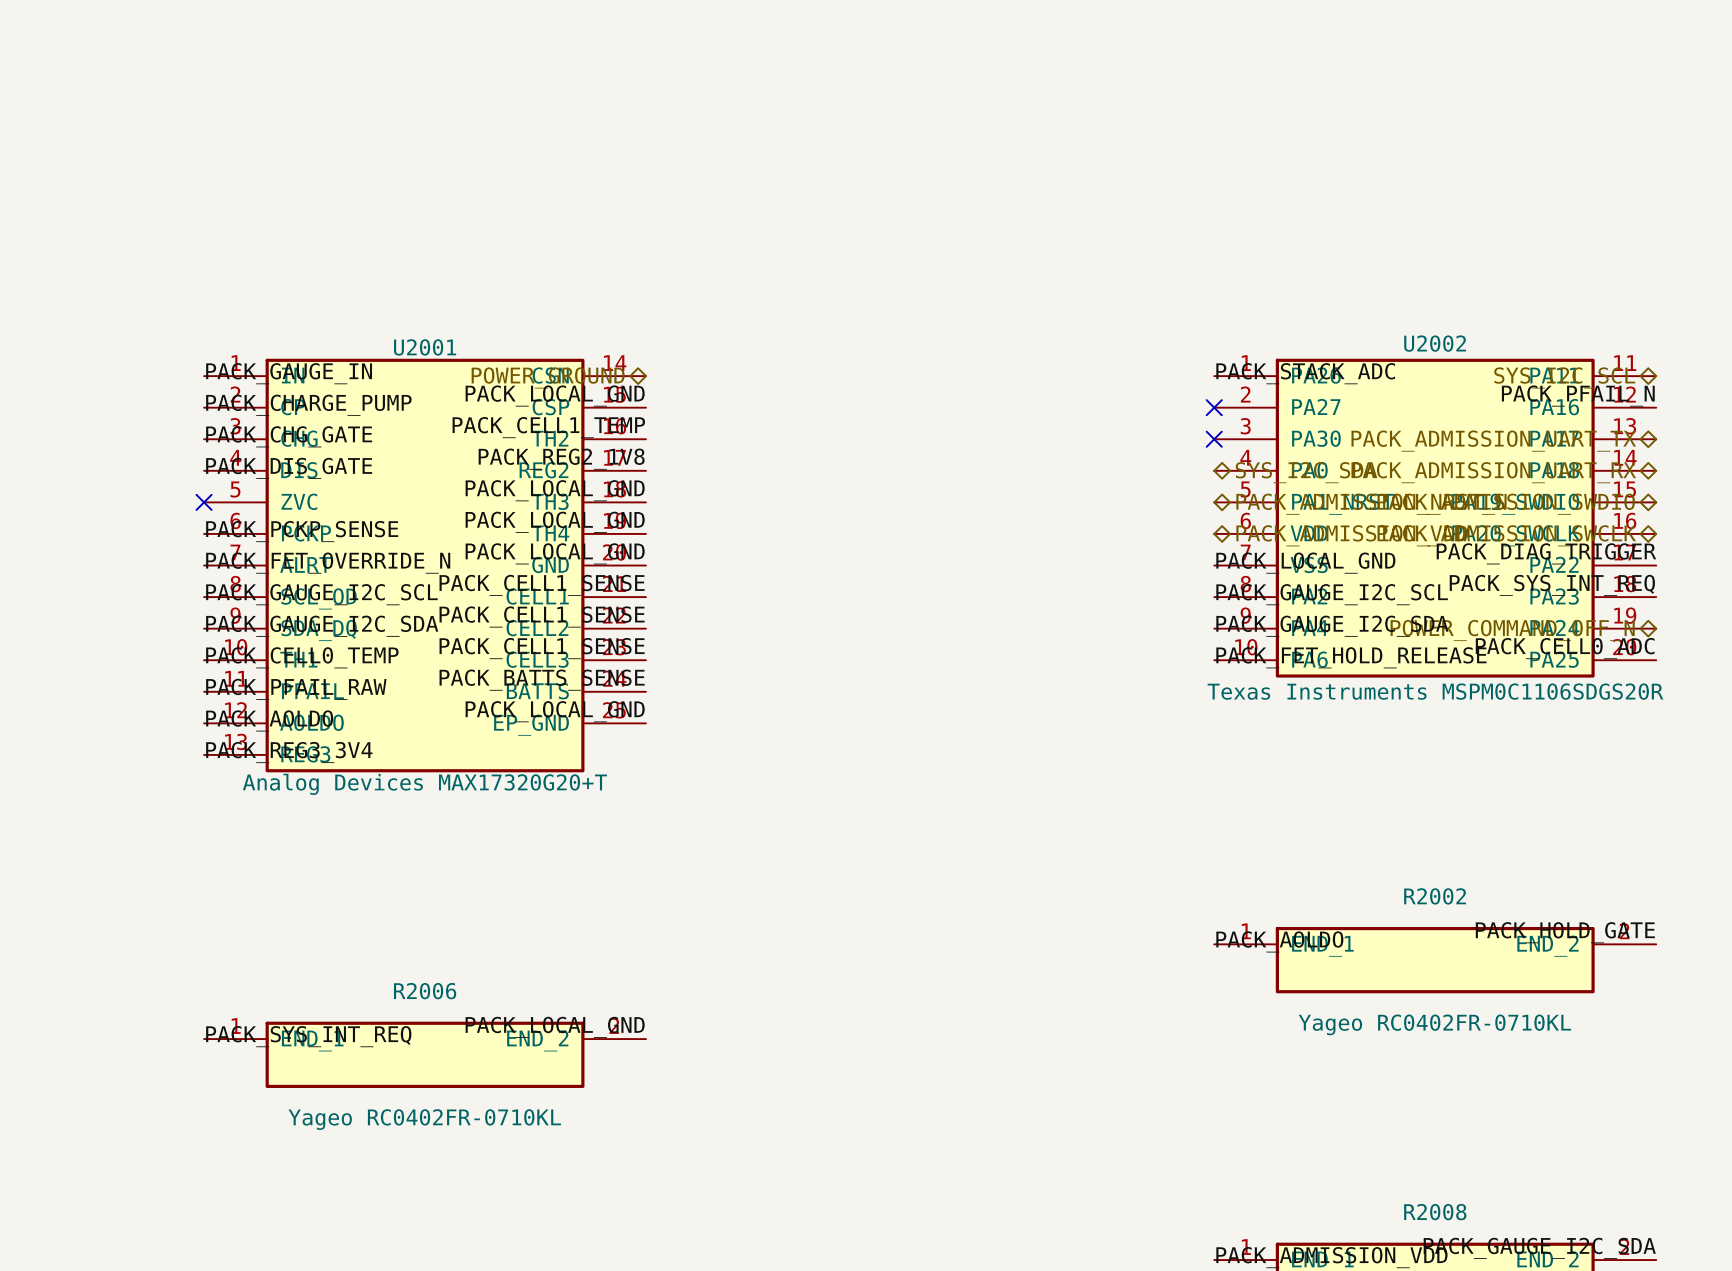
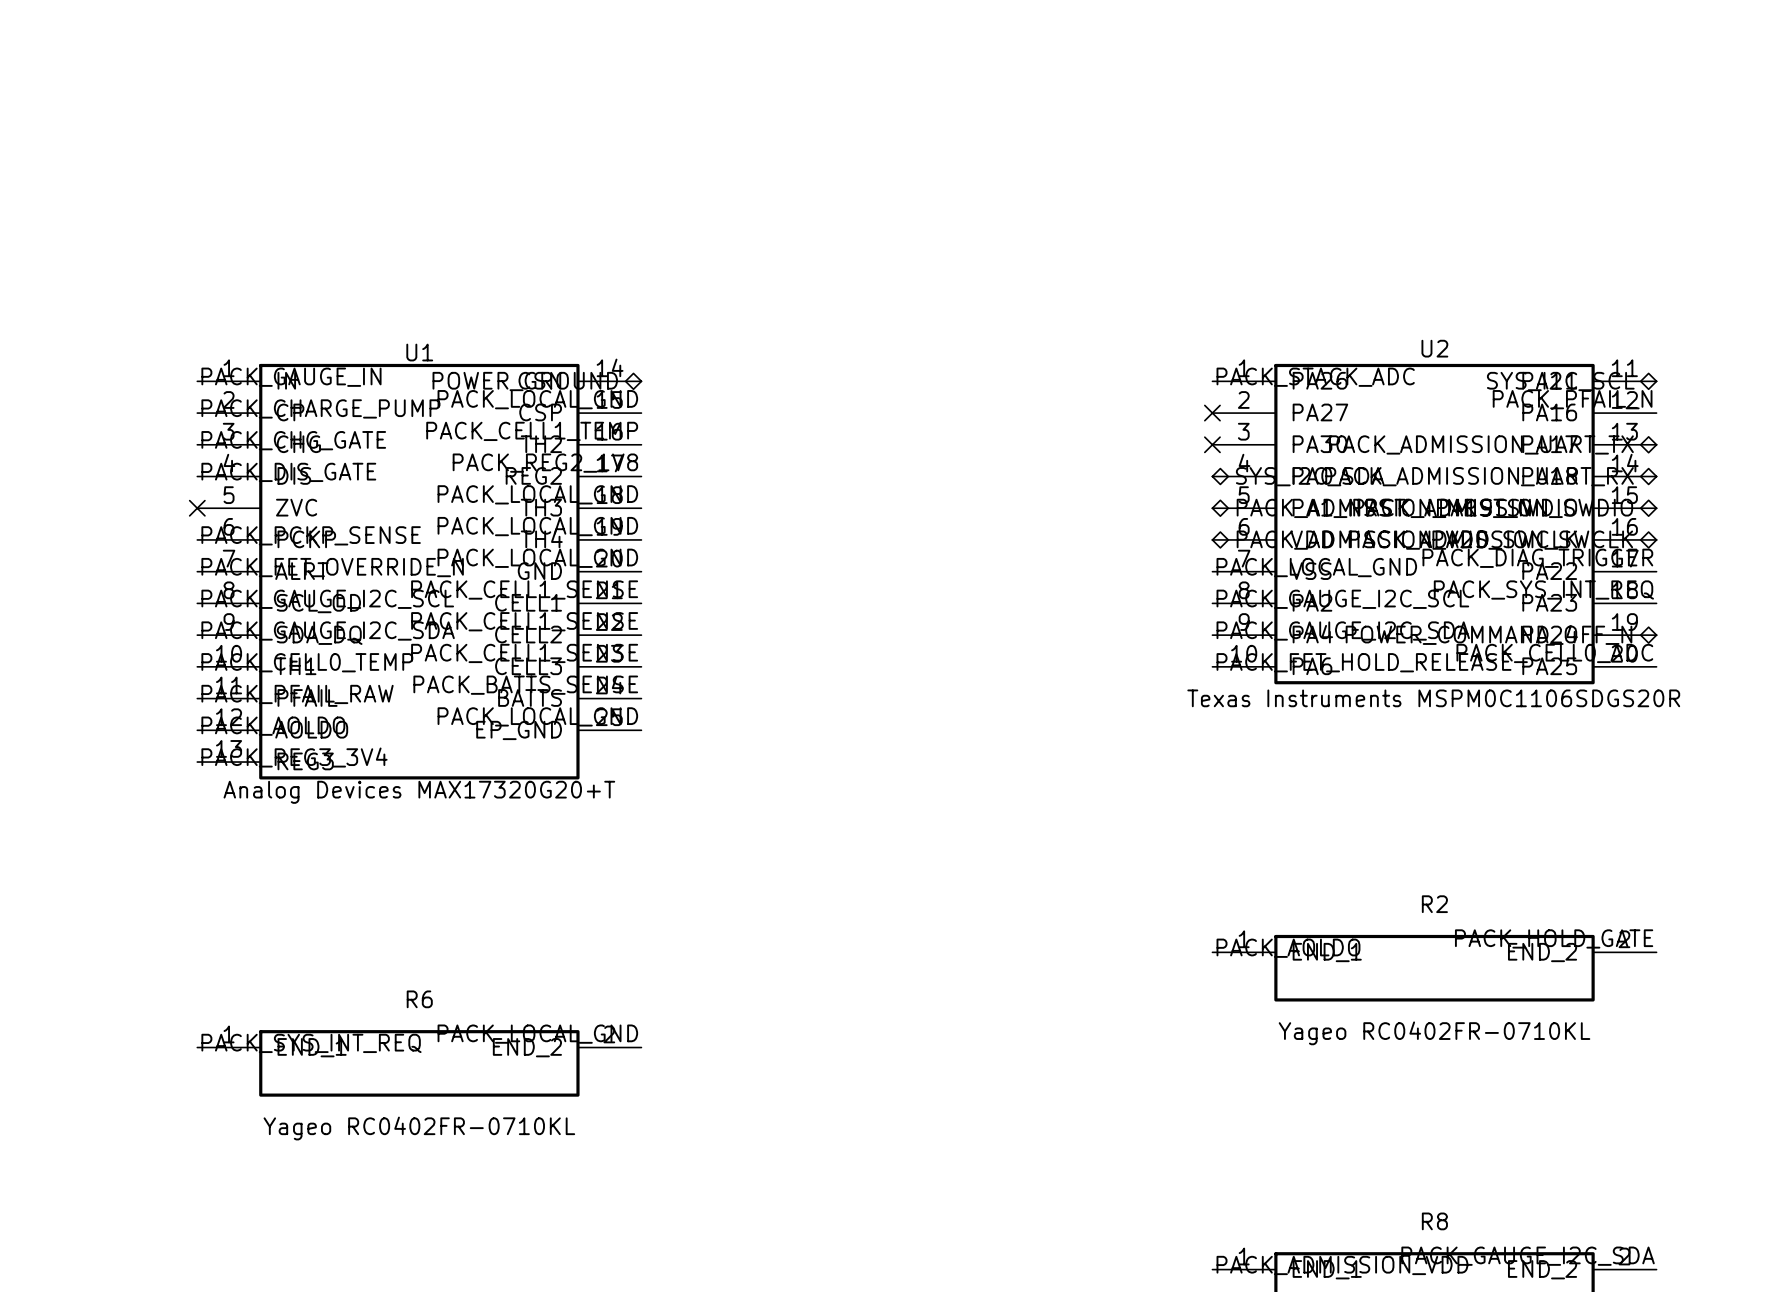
U2002 name: U2002 (1435, 343) -> U2 (1434, 348)
U2001 name: U2001 (425, 347) -> U1 (419, 352)
R2002 name: R2002 (1435, 896) -> R2 (1434, 904)
R2006 name: R2006 (425, 991) -> R6 (419, 999)
R2008 name: R2008 (1435, 1212) -> R8 (1434, 1221)

